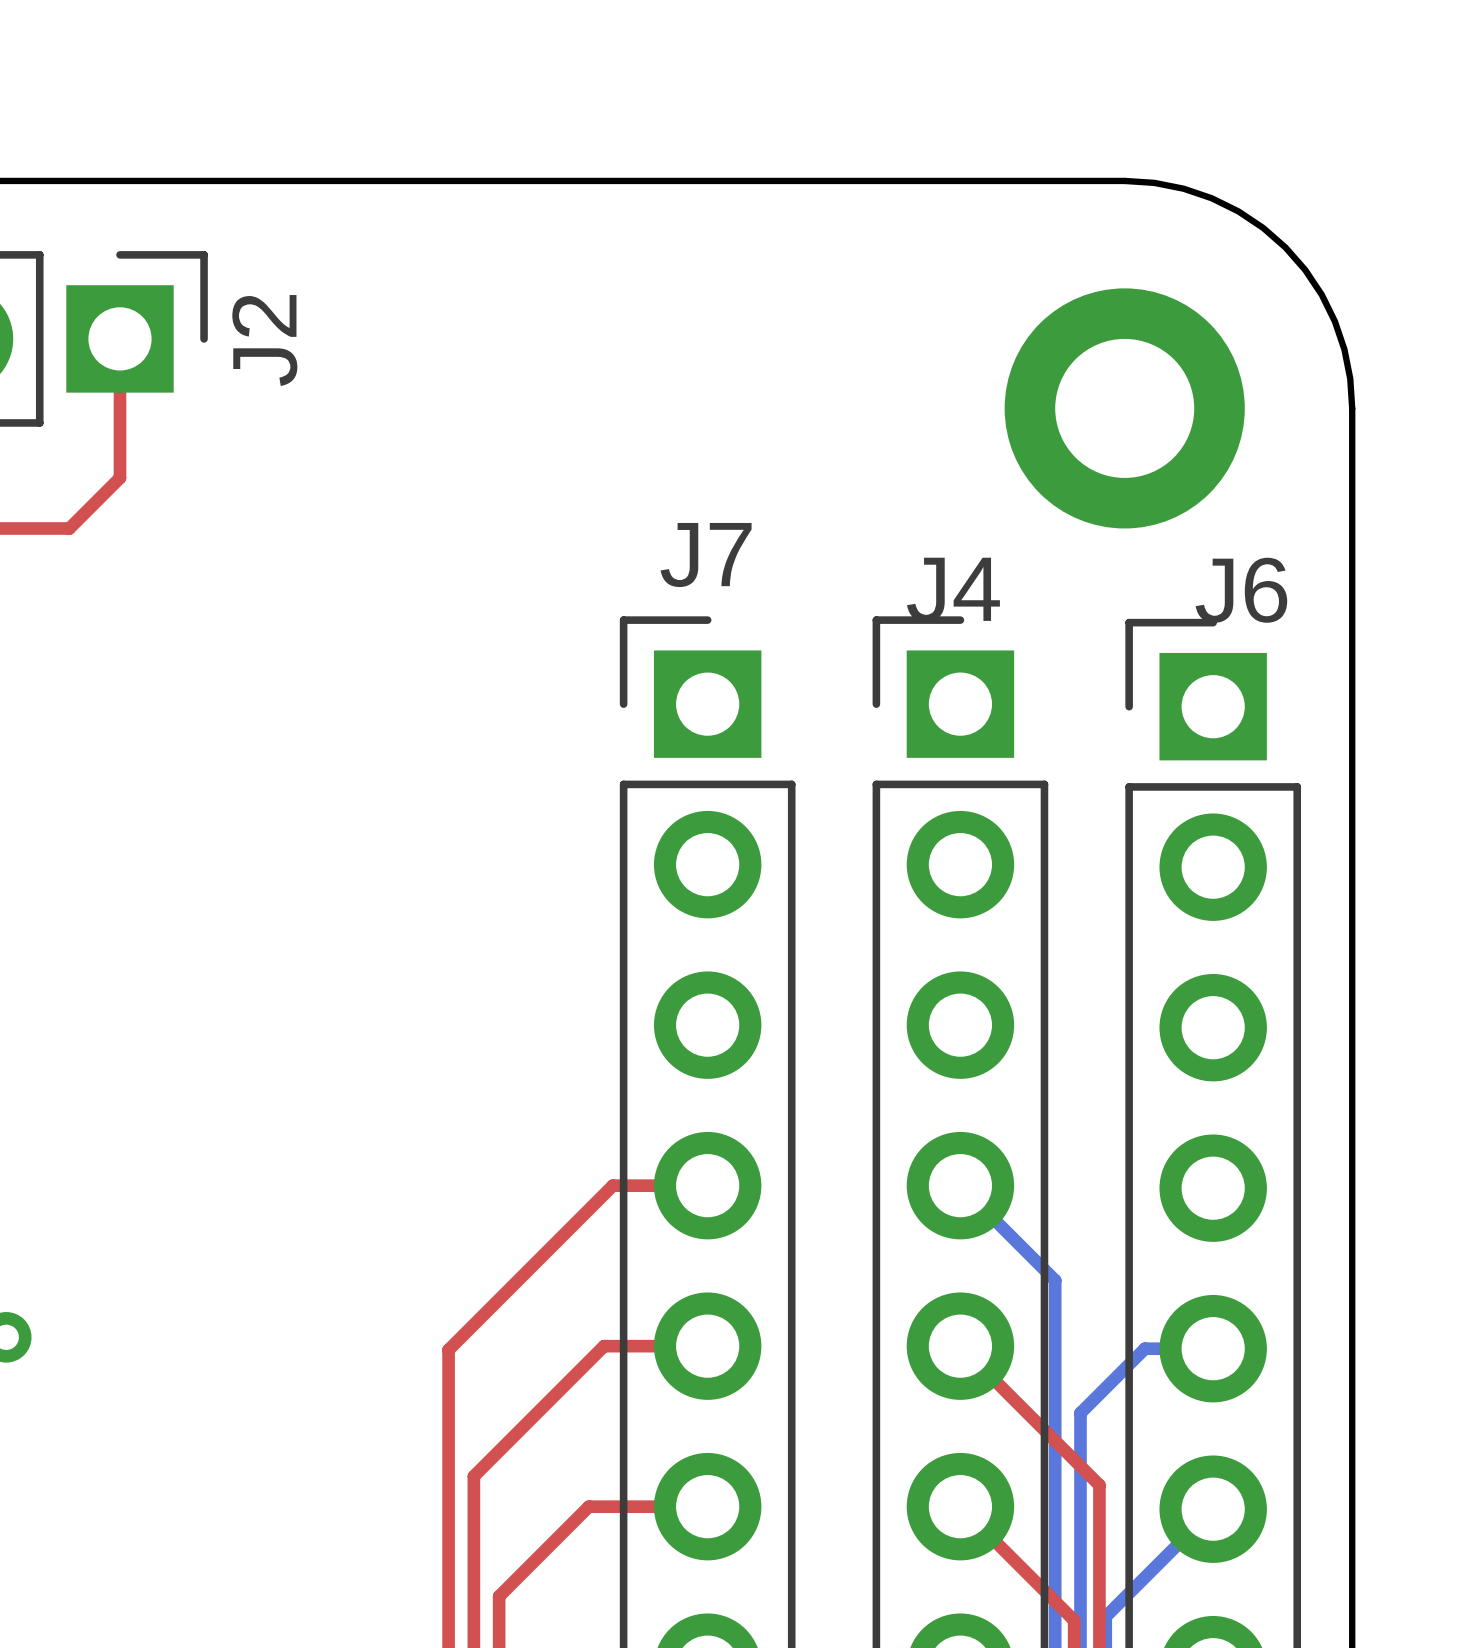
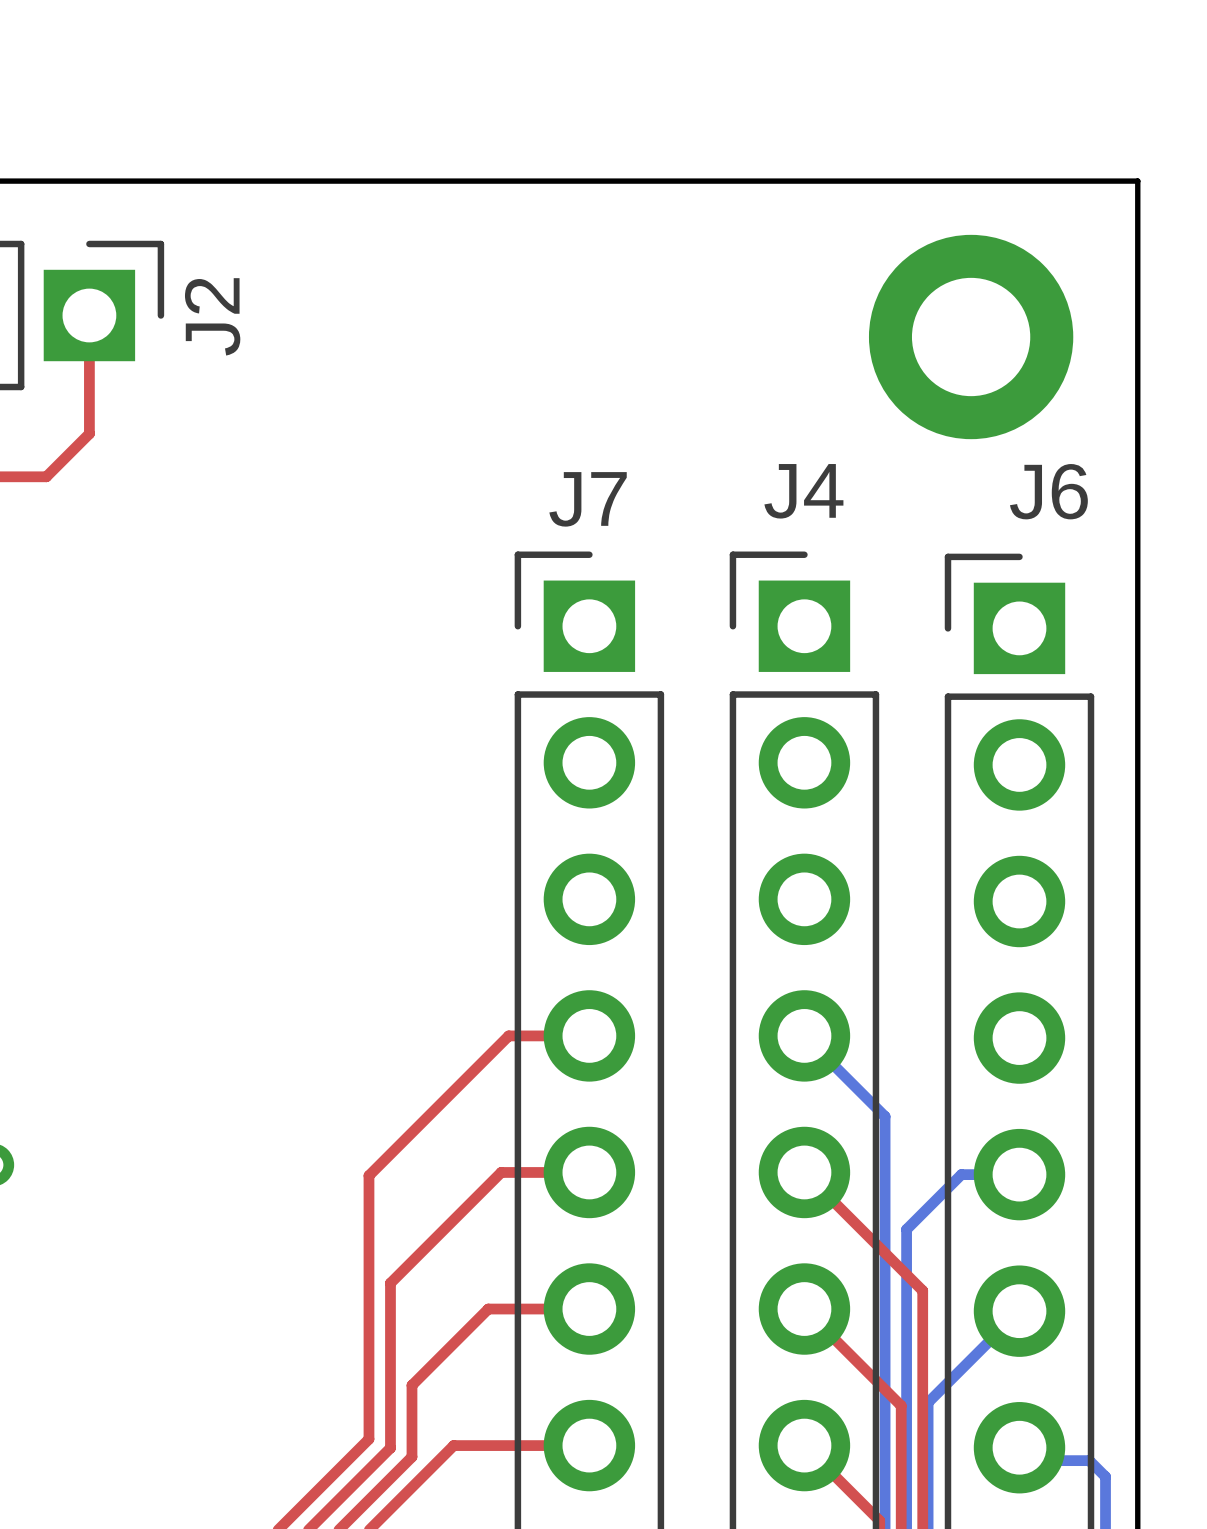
board edge: (1124, 180) (1154, 182) (1183, 188) (1211, 198) (1238, 211) (1263, 227) (1285, 247) (1305, 269) (1321, 294) (1334, 321) (1344, 349) (1350, 378) (1352, 408) -> (944, 181) (1137, 181) (1137, 374)
part position: (1124, 408) -> (971, 337)
J4 name position: J4 (953, 589) -> J4 (803, 491)
text position: J6 (1241, 590) -> J6 (1048, 491)

